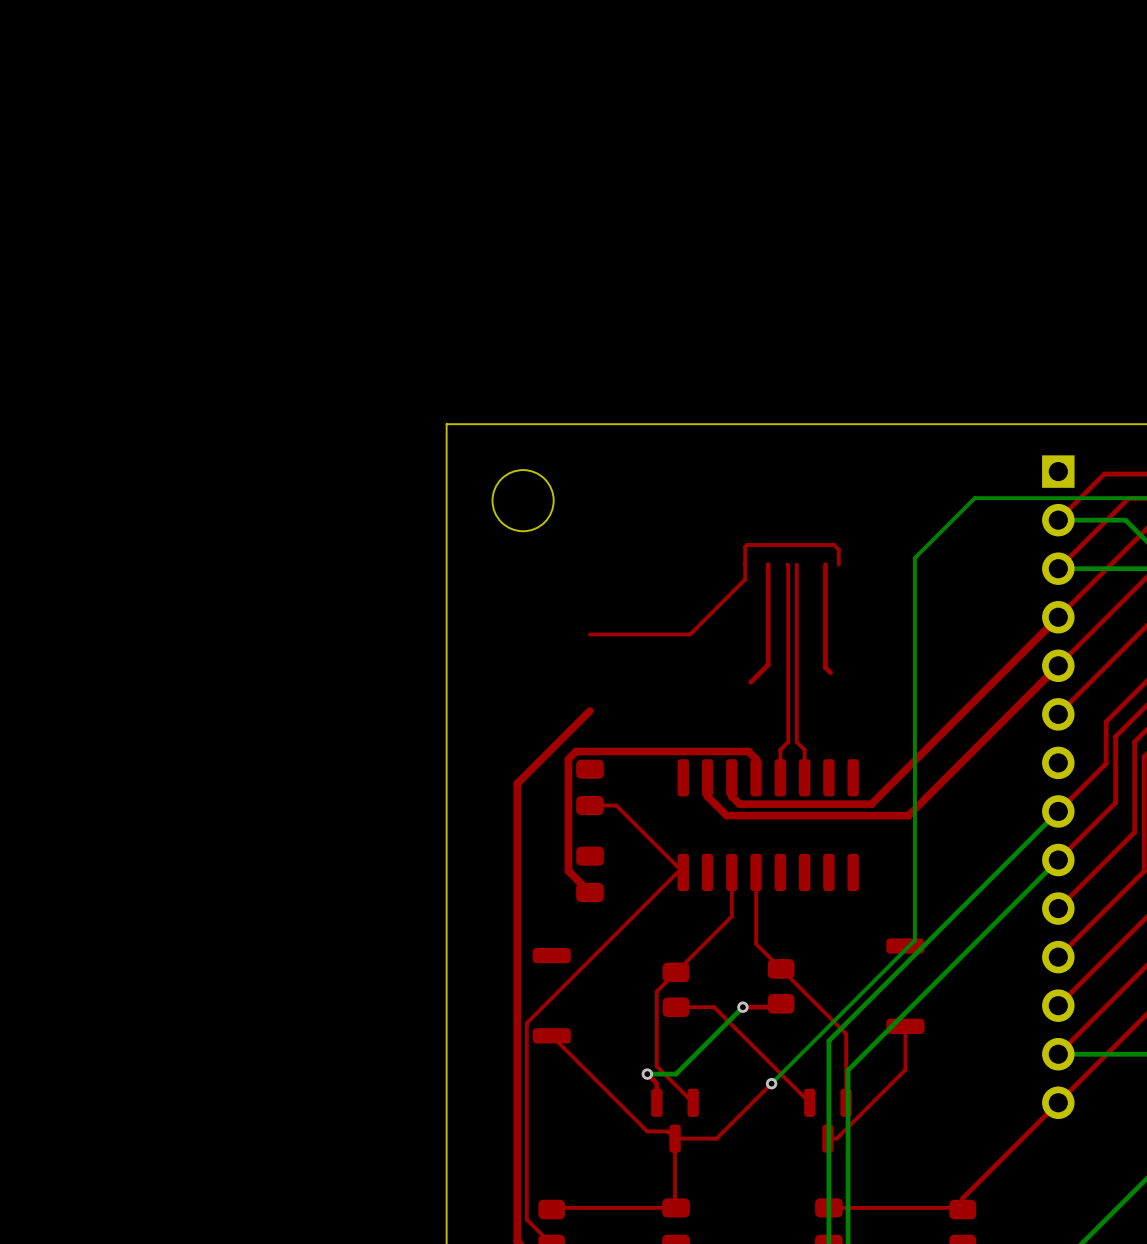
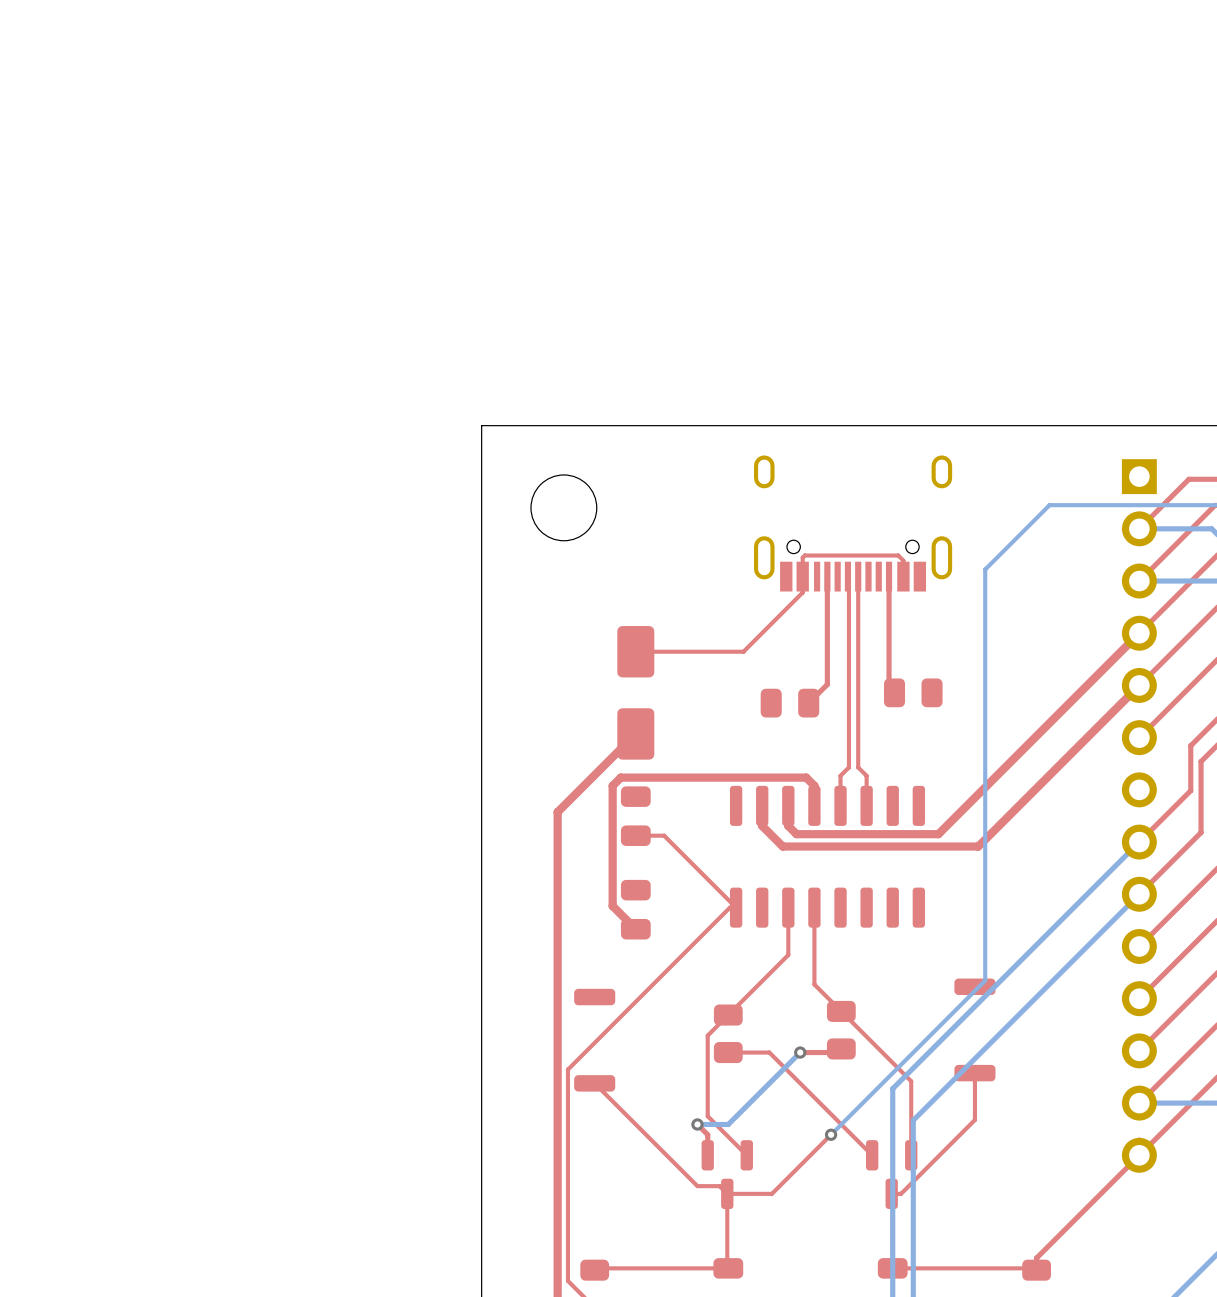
part: none -> (853, 523)
part: none -> (635, 692)
part: none -> (913, 692)
part: none -> (789, 703)

